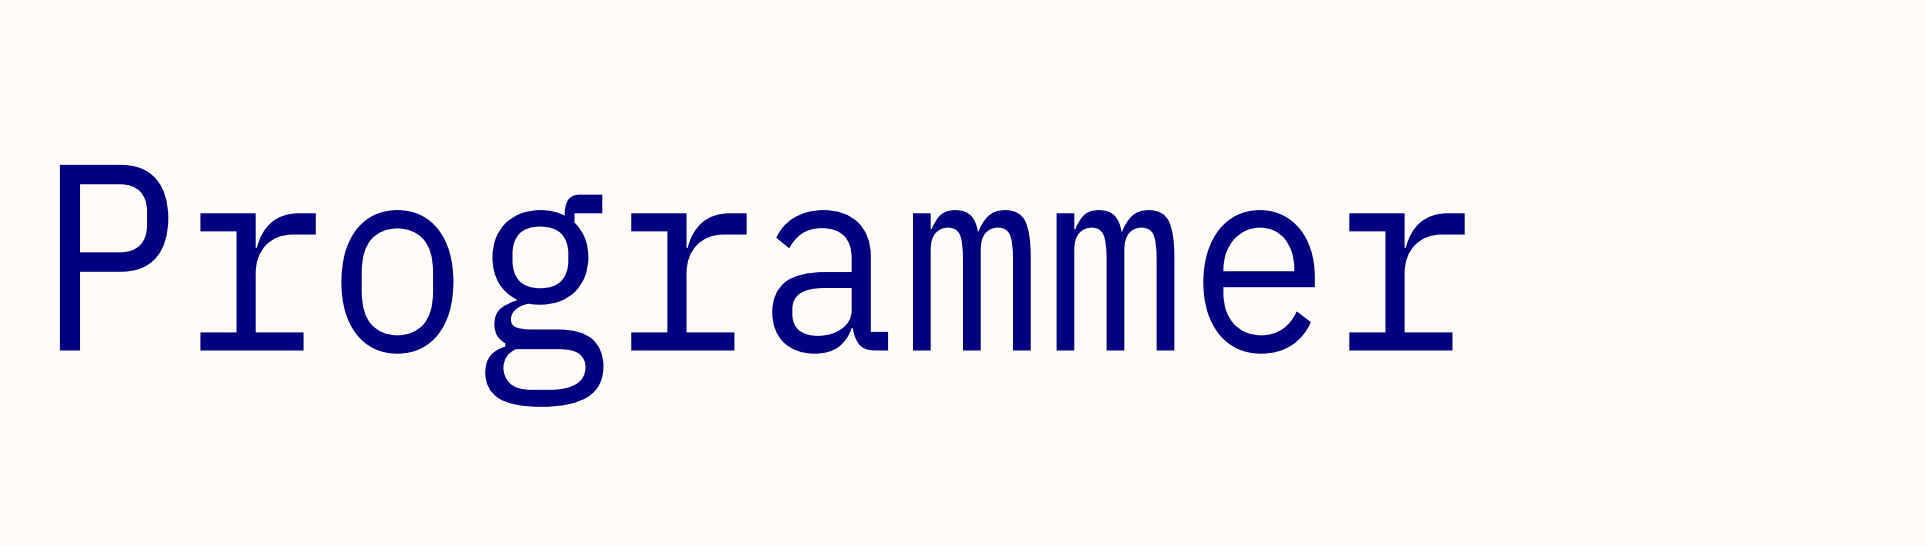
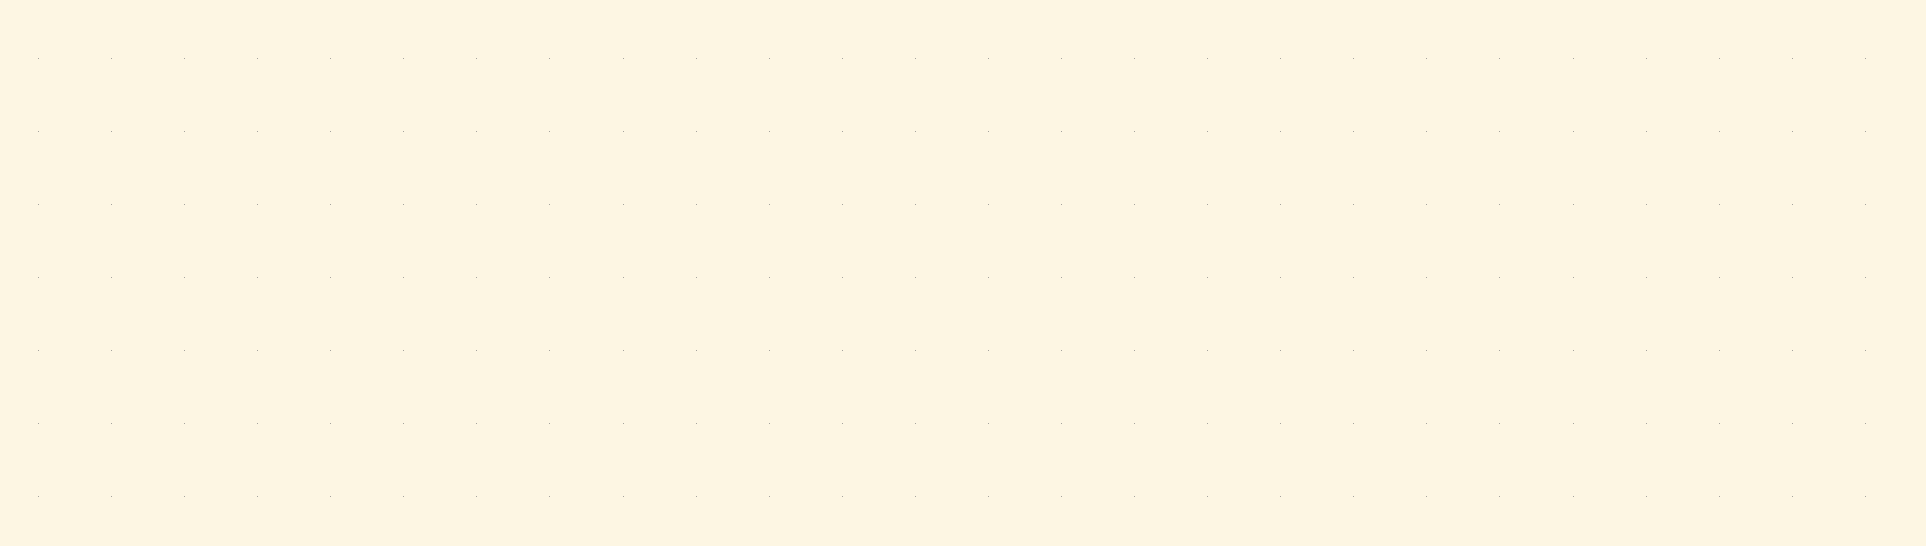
text: Programmer (762, 285) -> none

